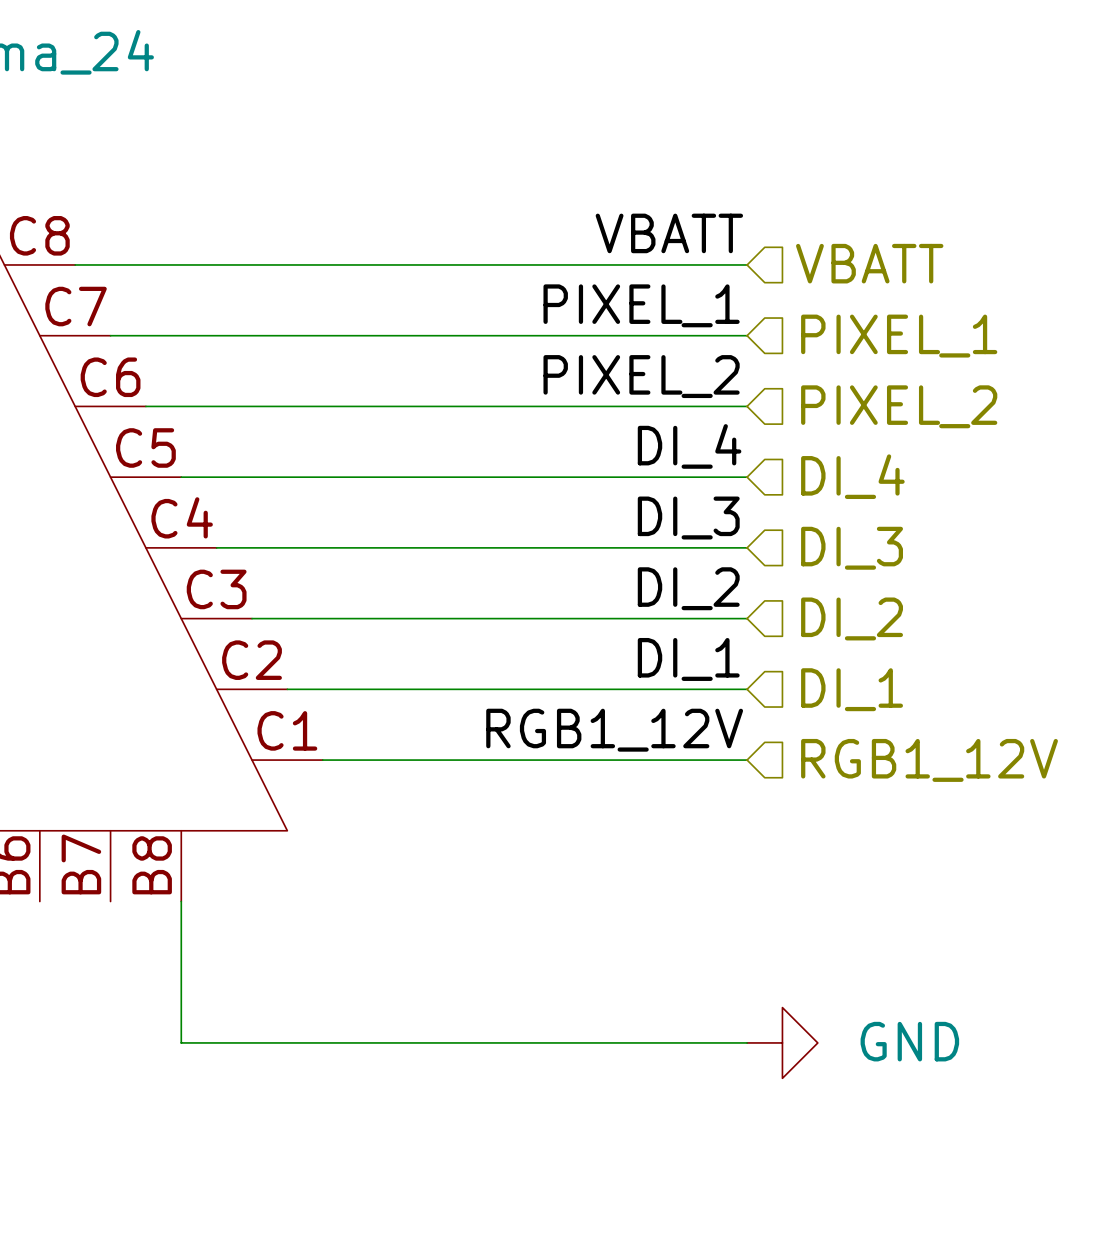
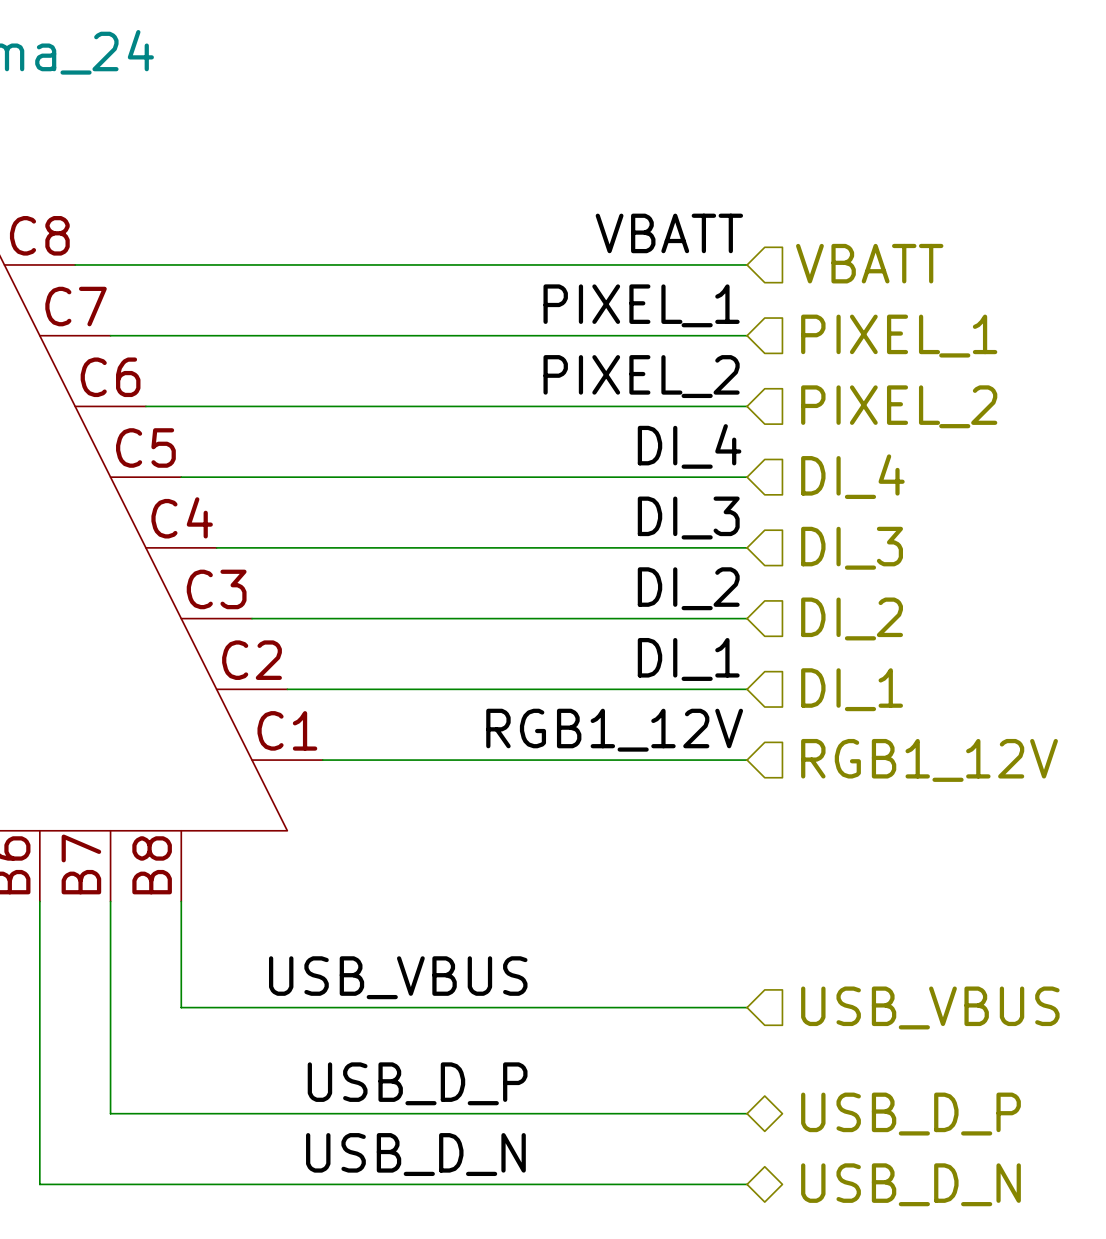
wire: none -> (39, 901) (39, 1184) (747, 1184)
wire: none -> (110, 901) (110, 1113) (747, 1113)
label: none -> USB_VBUS (398, 977)
wire: (181, 1007) (181, 1042) (747, 1042) -> (181, 1007) (747, 1007)
hierarchical label: none -> USB_VBUS (930, 1007)
power symbol: GND (782, 1042) -> none
label: none -> USB_D_P (417, 1083)
hierarchical label: none -> USB_D_P (910, 1114)
label: none -> USB_D_N (415, 1154)
hierarchical label: none -> USB_D_N (910, 1184)

